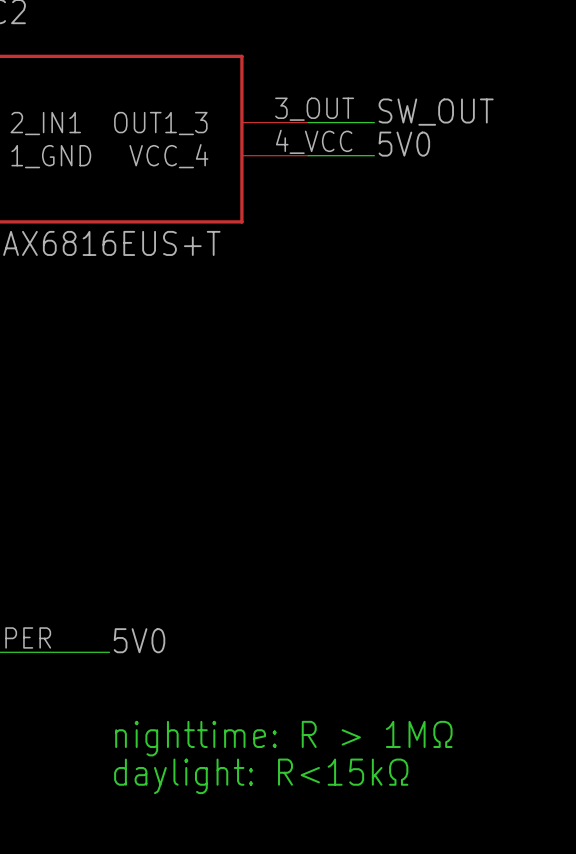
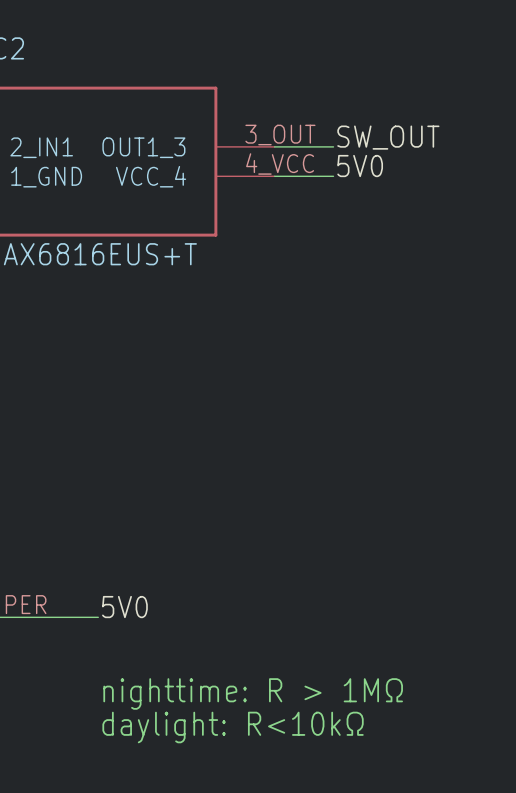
text: daylight: R<15kΩ (261, 776) -> daylight: R<10kΩ (233, 727)

